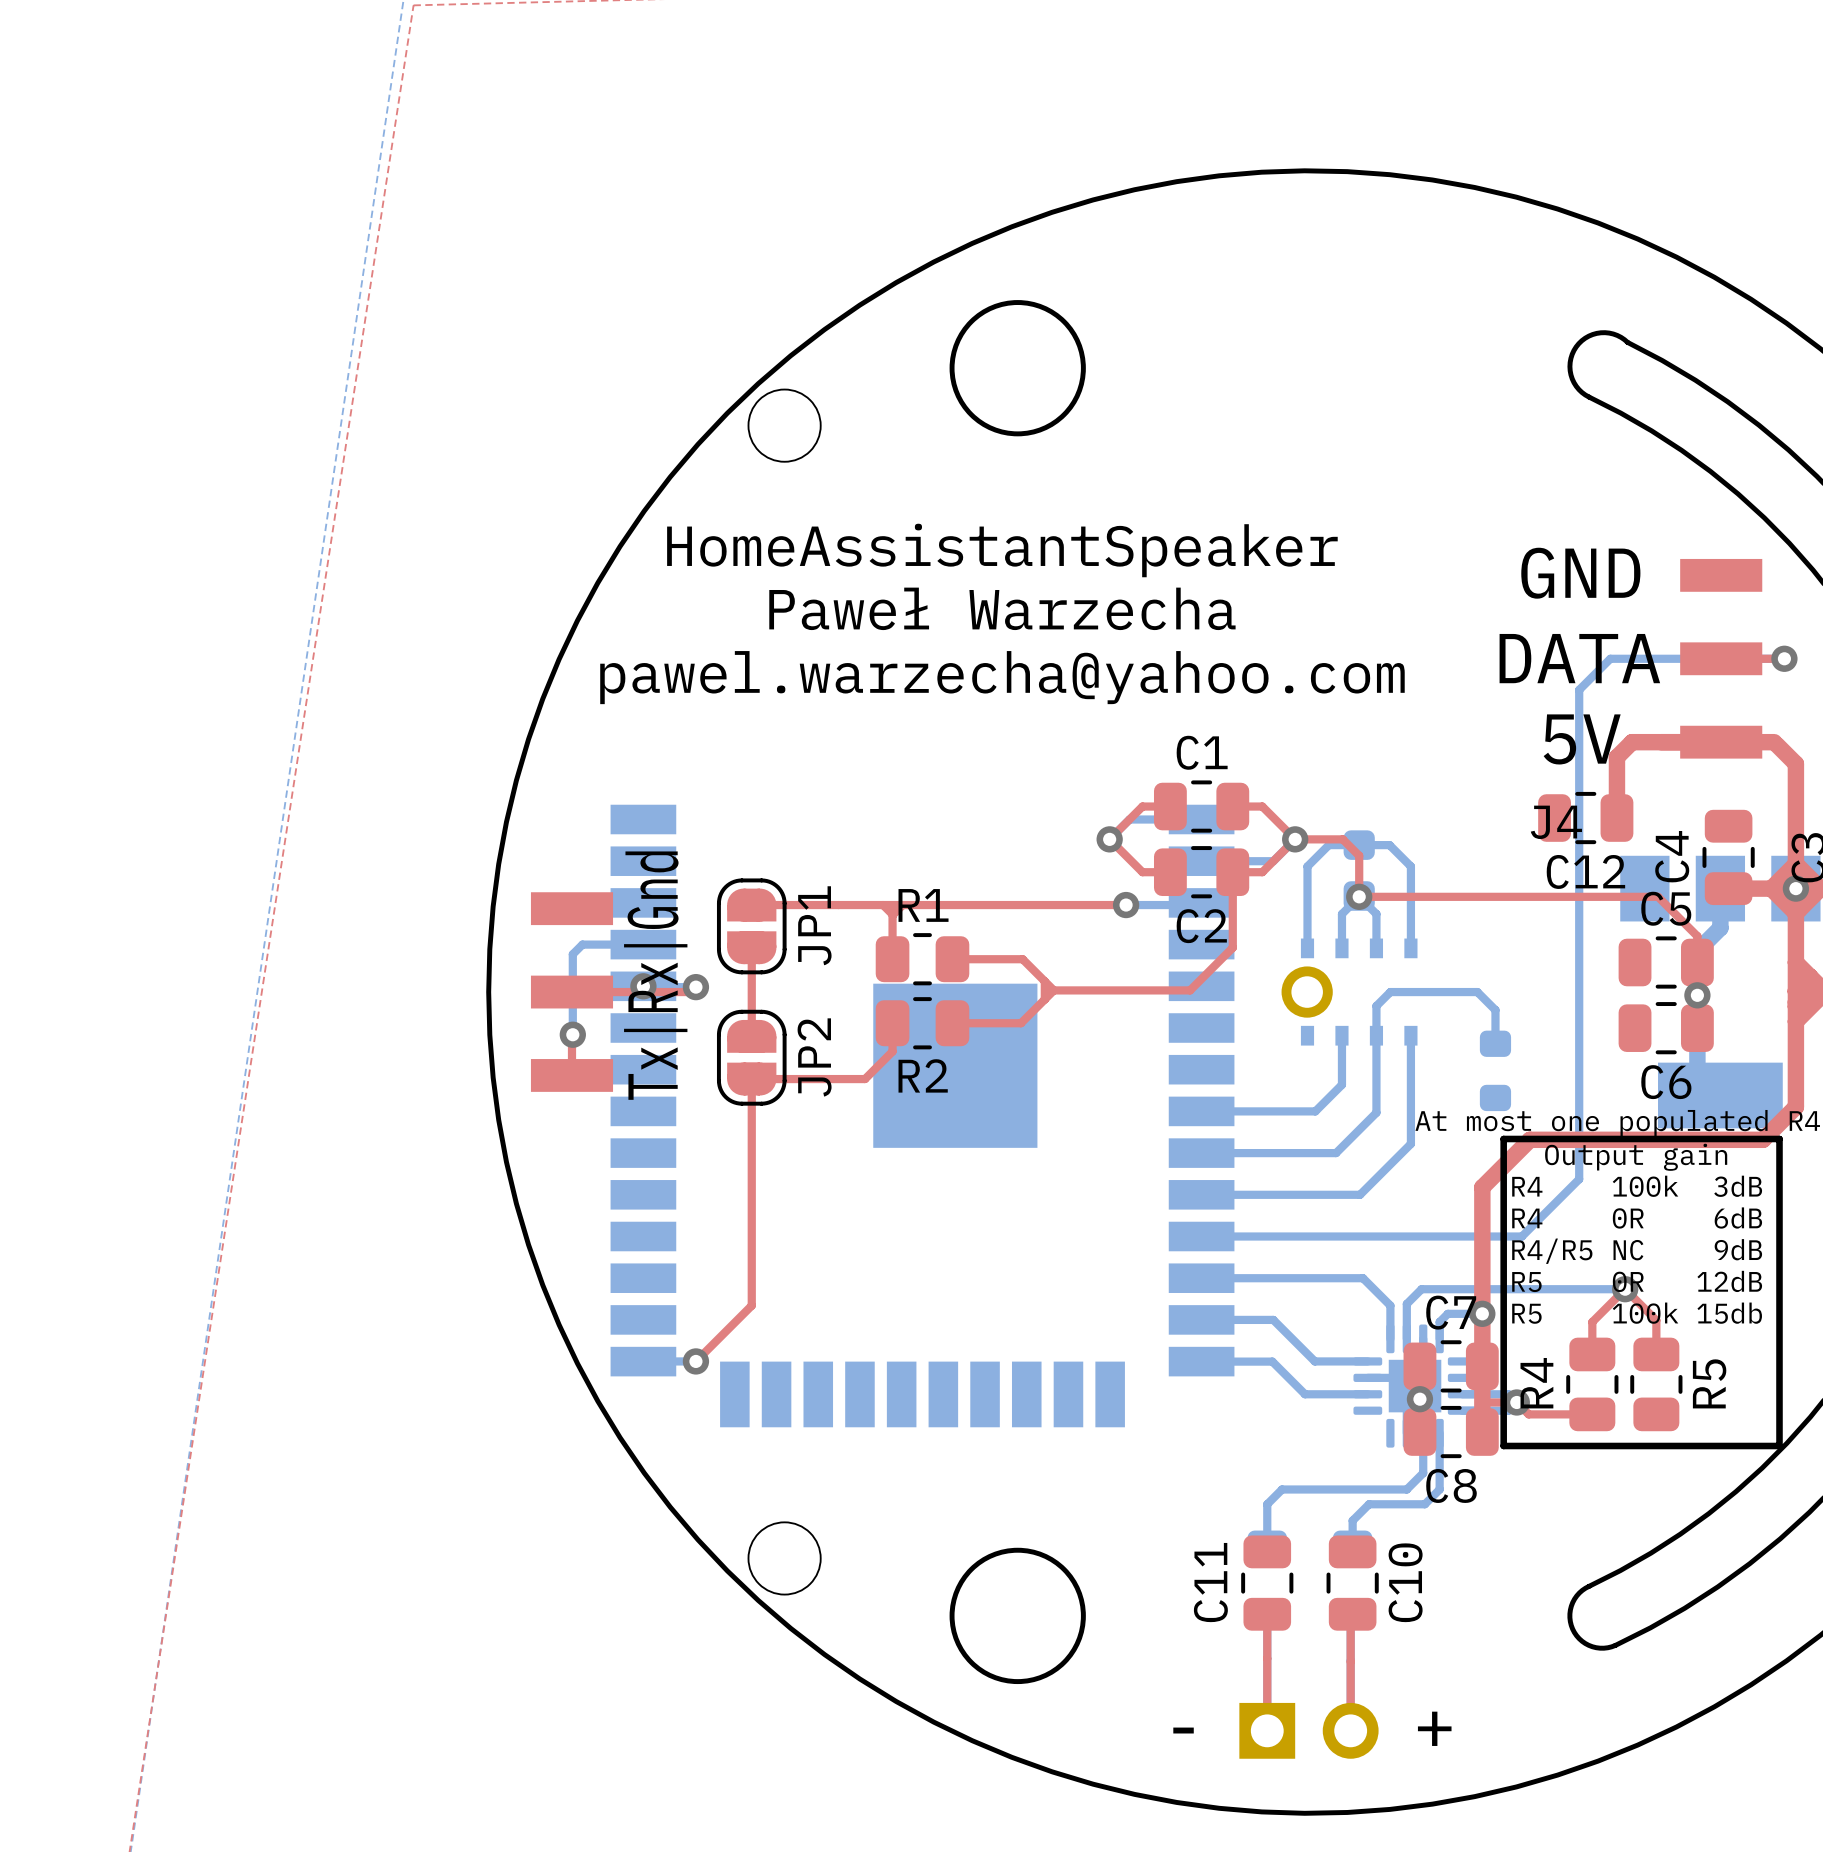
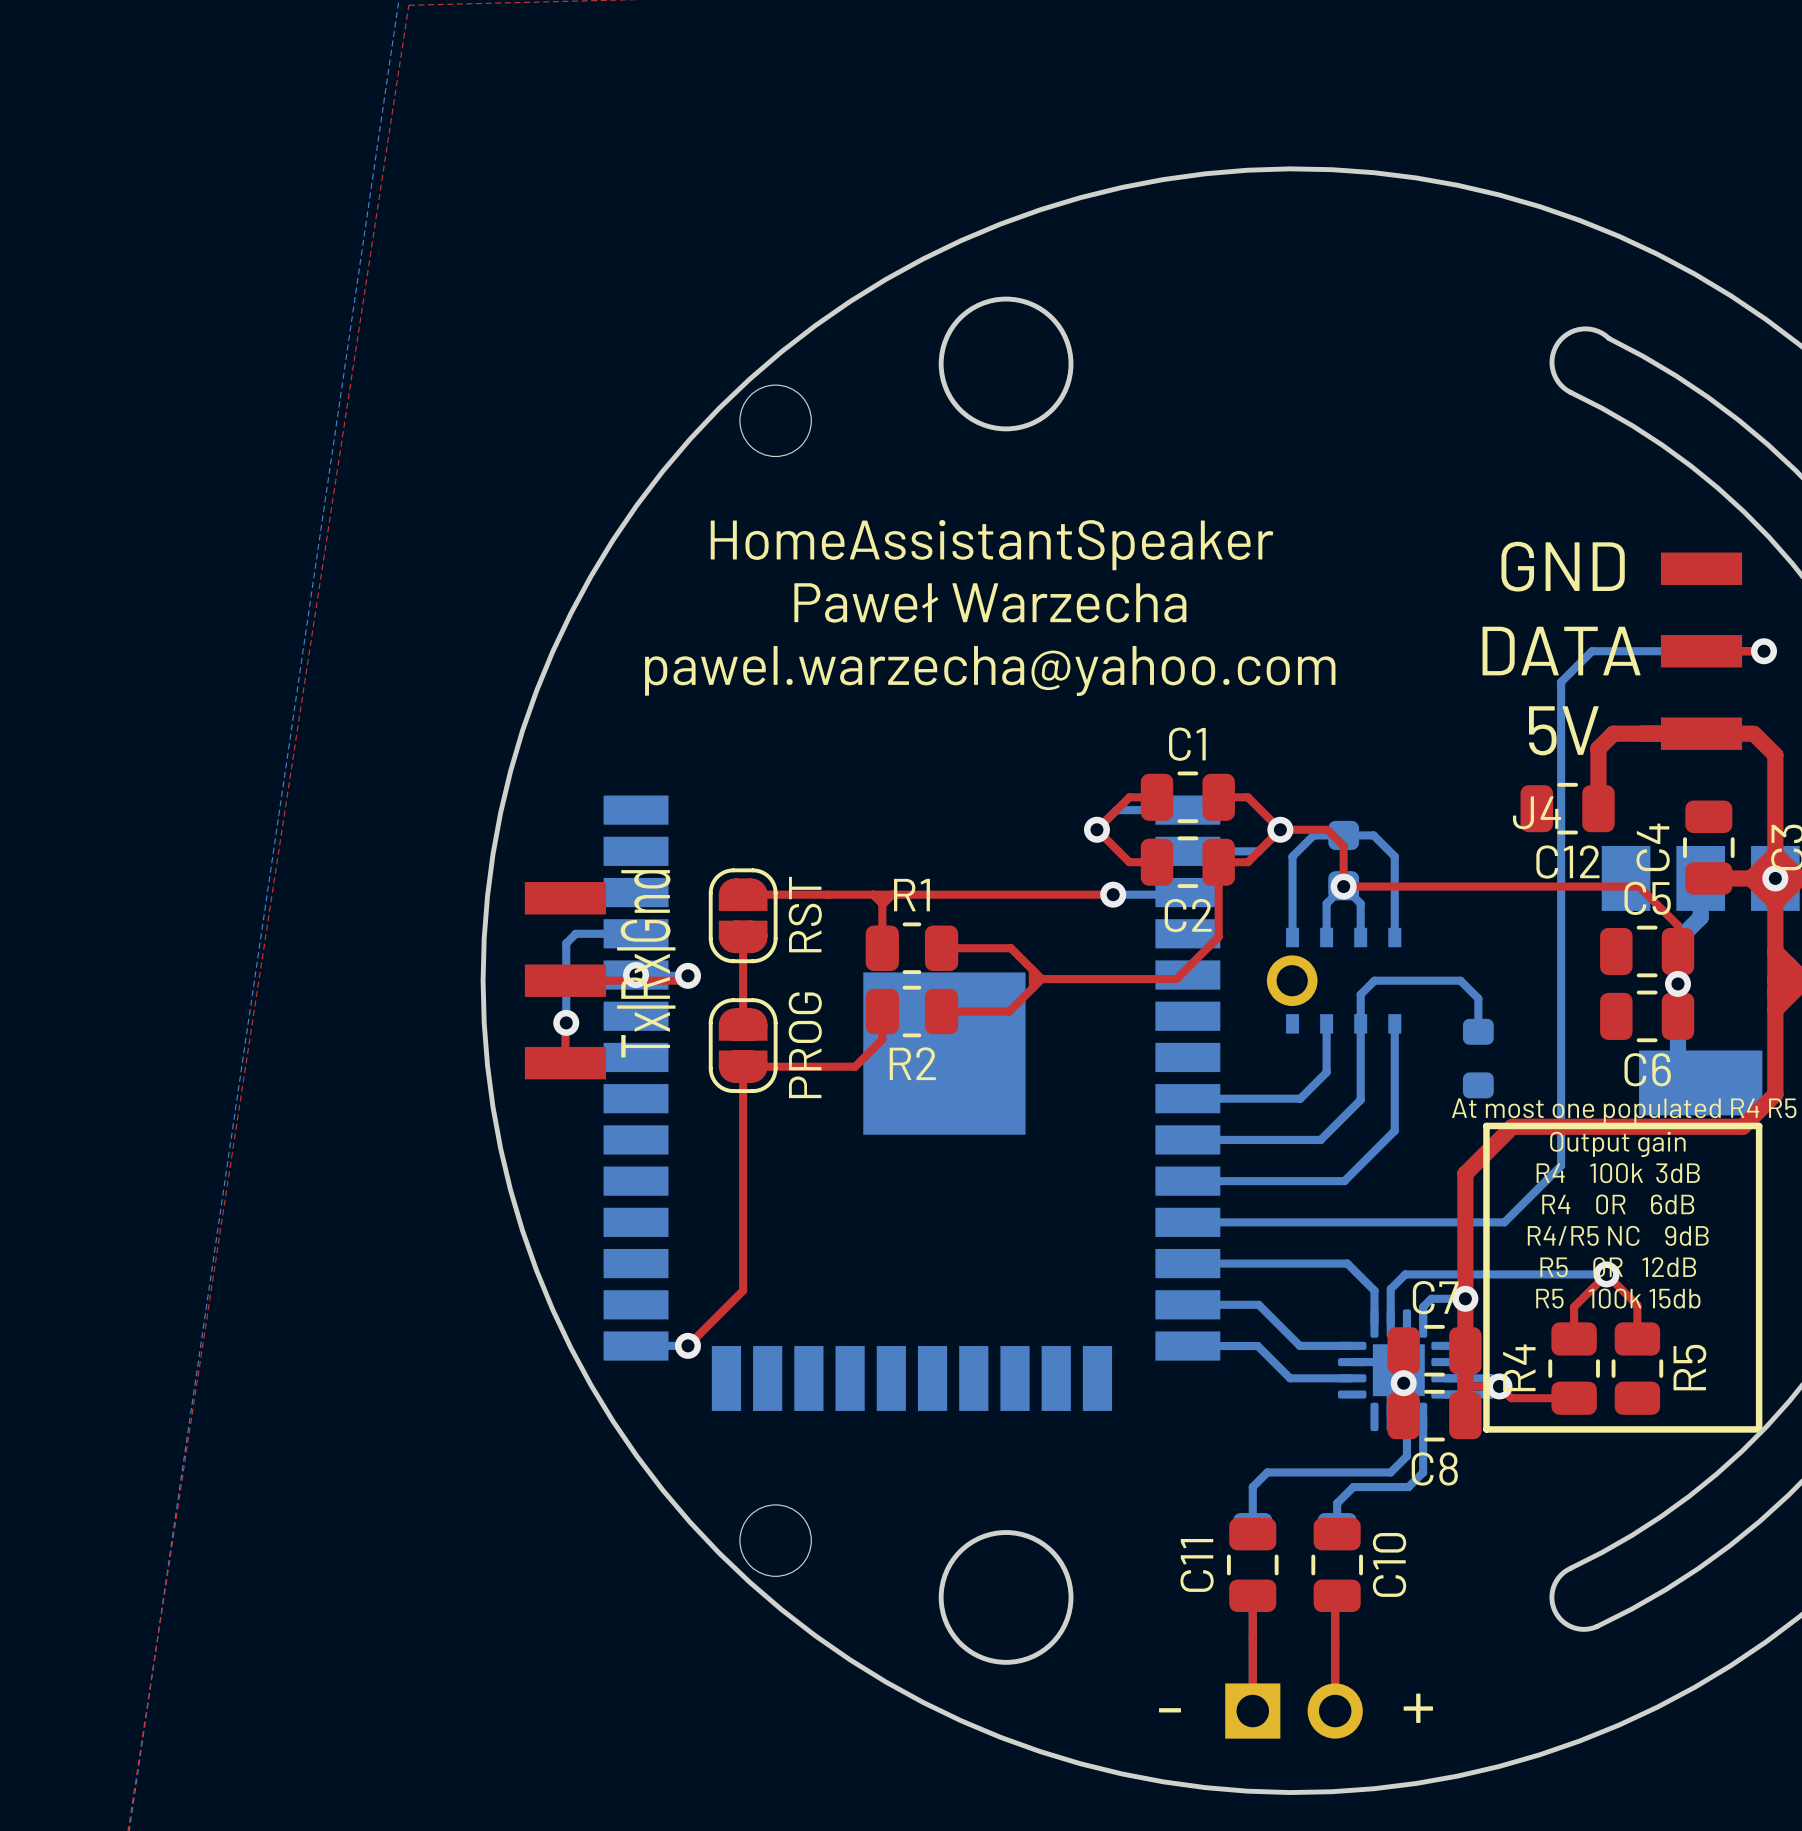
JP1 name: JP1 (814, 925) -> RST (805, 914)
JP2 name: JP2 (814, 1057) -> PROG (805, 1045)

